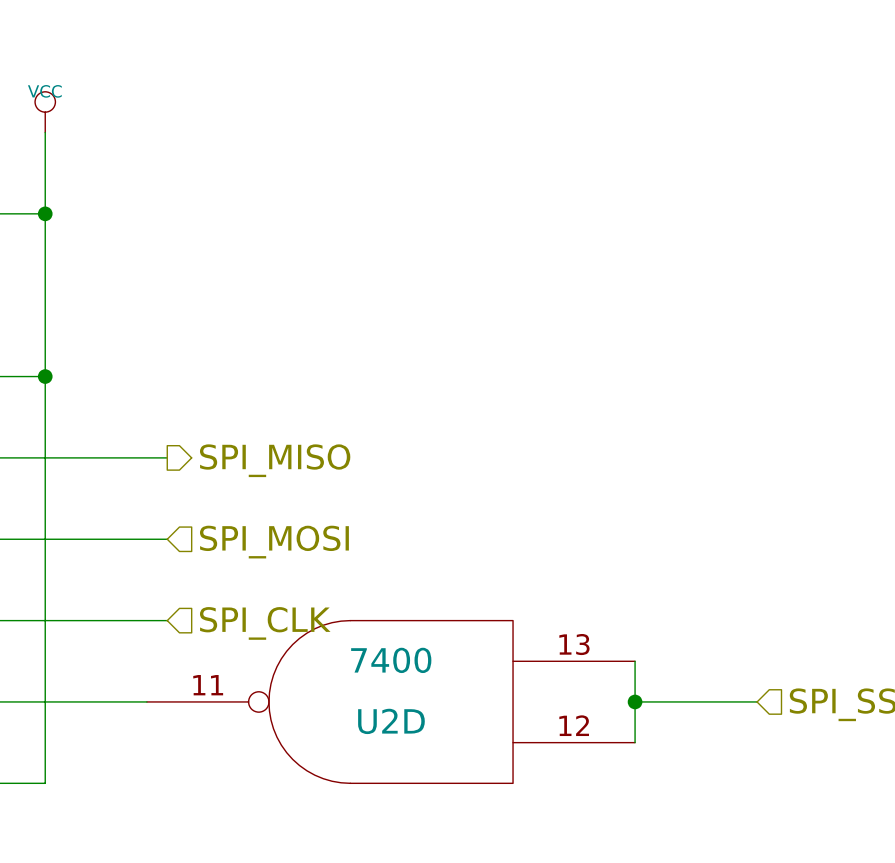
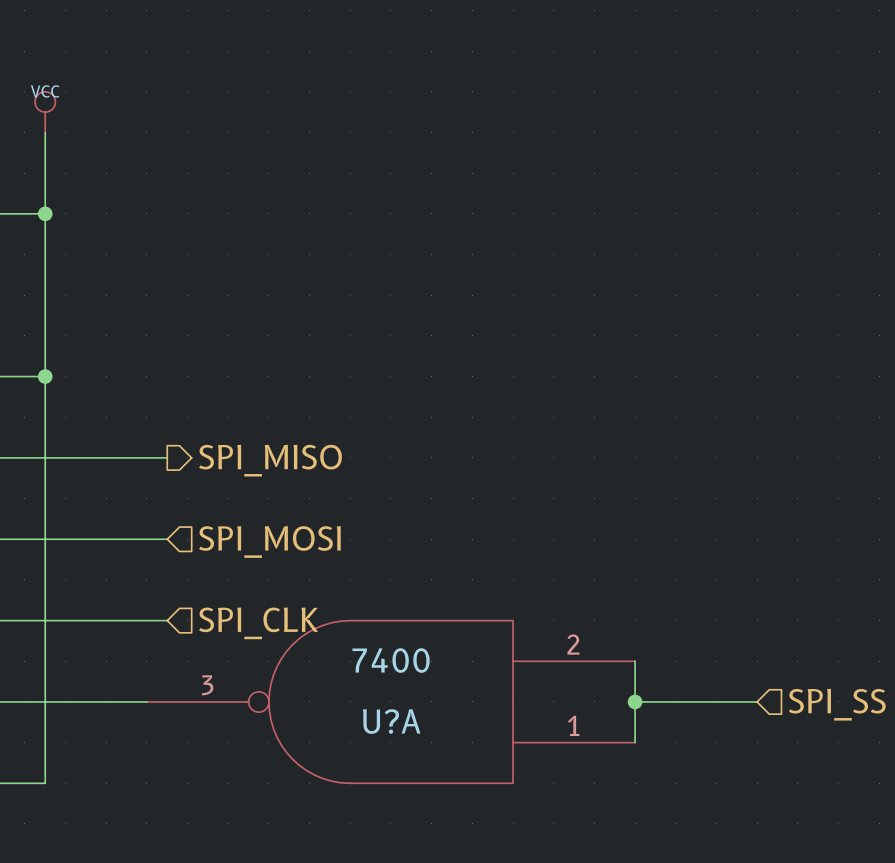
U2D pin number: 13 (574, 644) -> 2 (573, 644)
U2D pin number: 11 (208, 685) -> 3 (207, 685)
U2D name: U2D (391, 721) -> U?A (391, 721)
U2D pin number: 12 (574, 725) -> 1 (573, 725)

